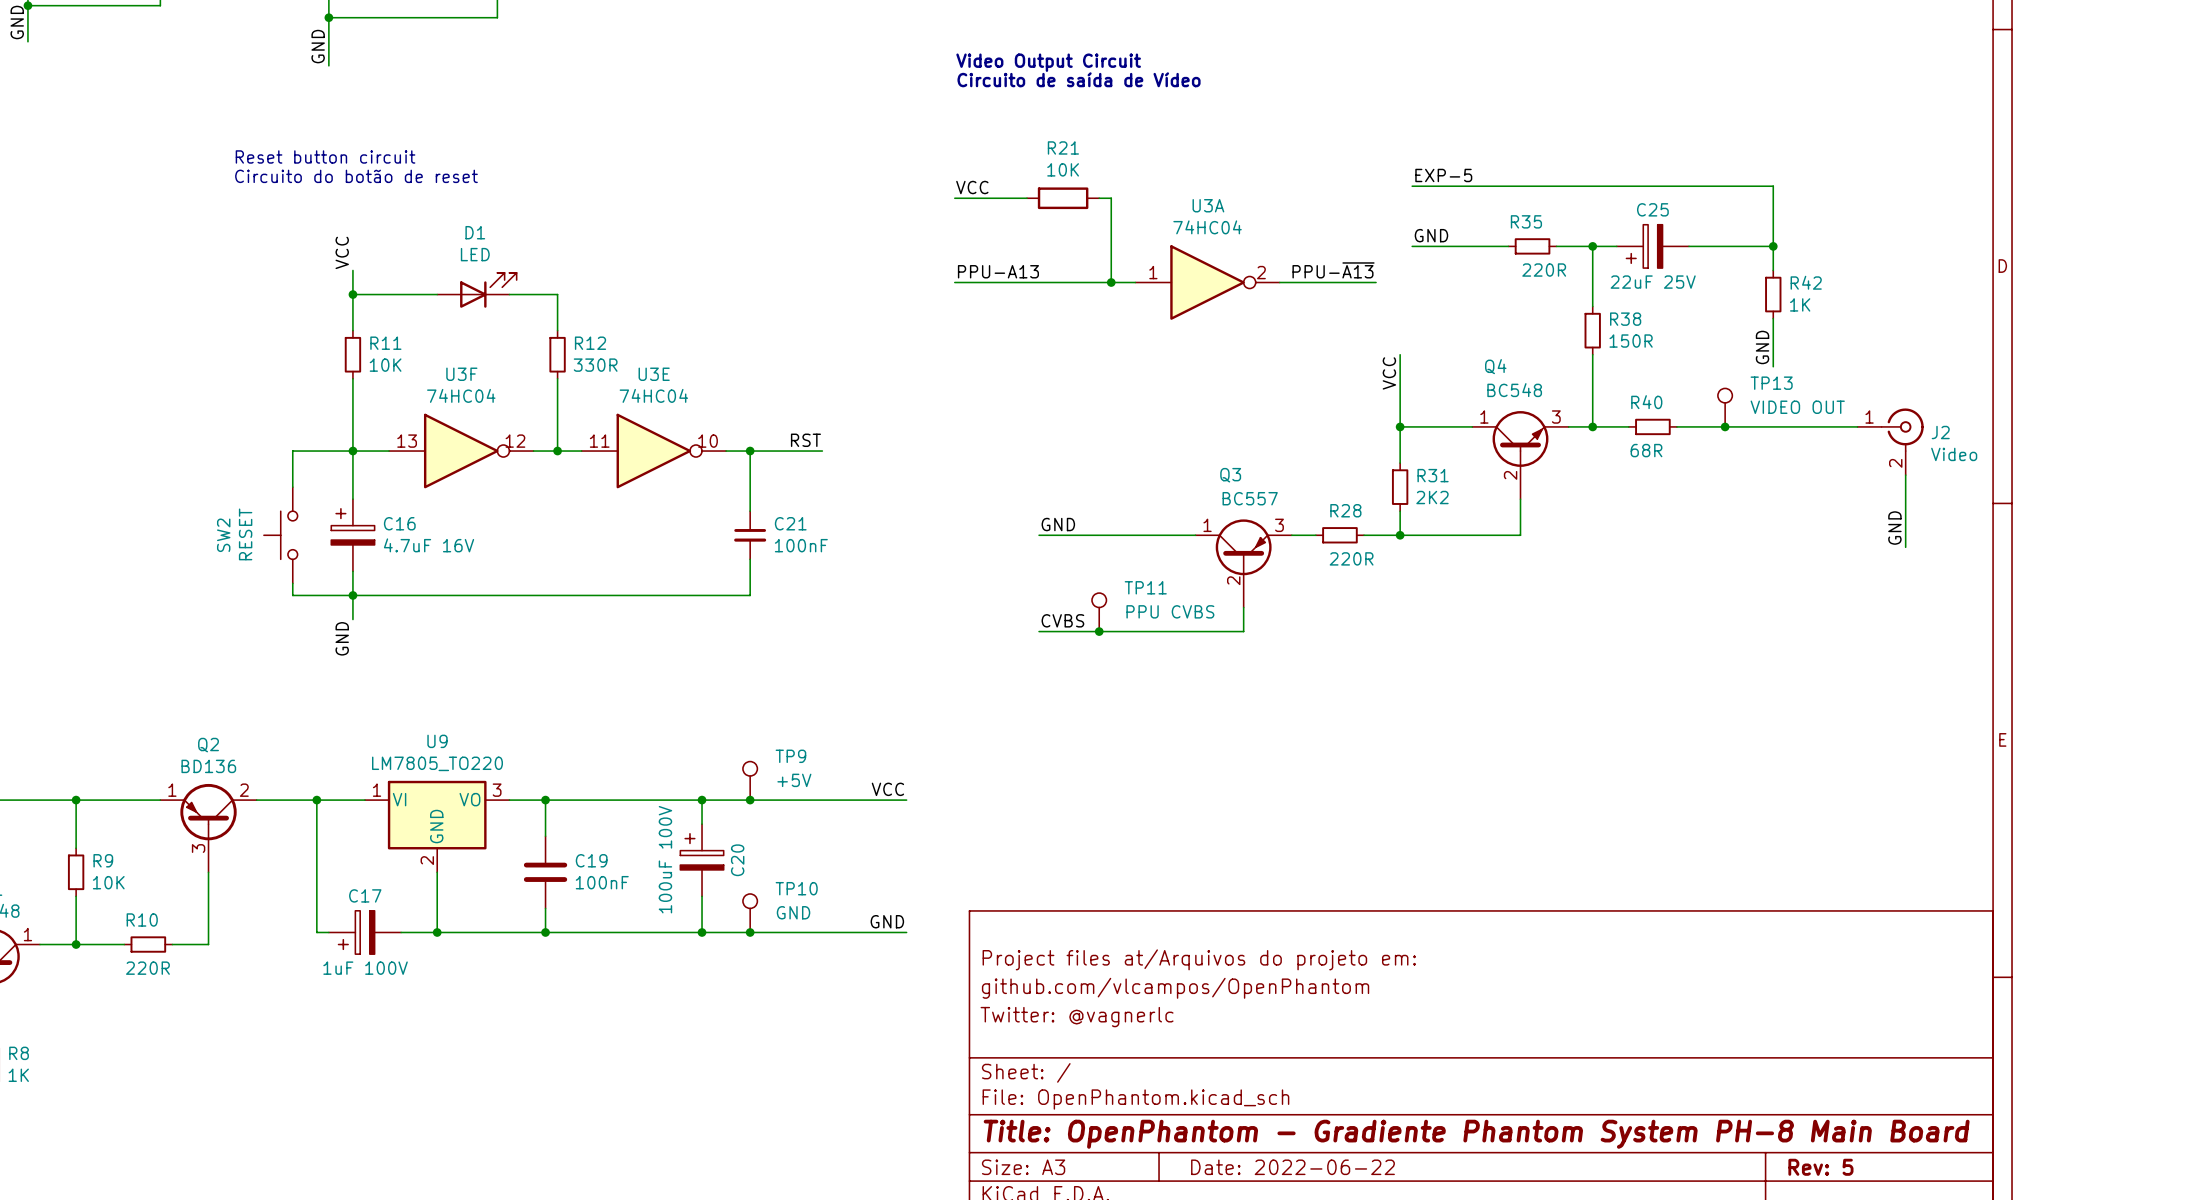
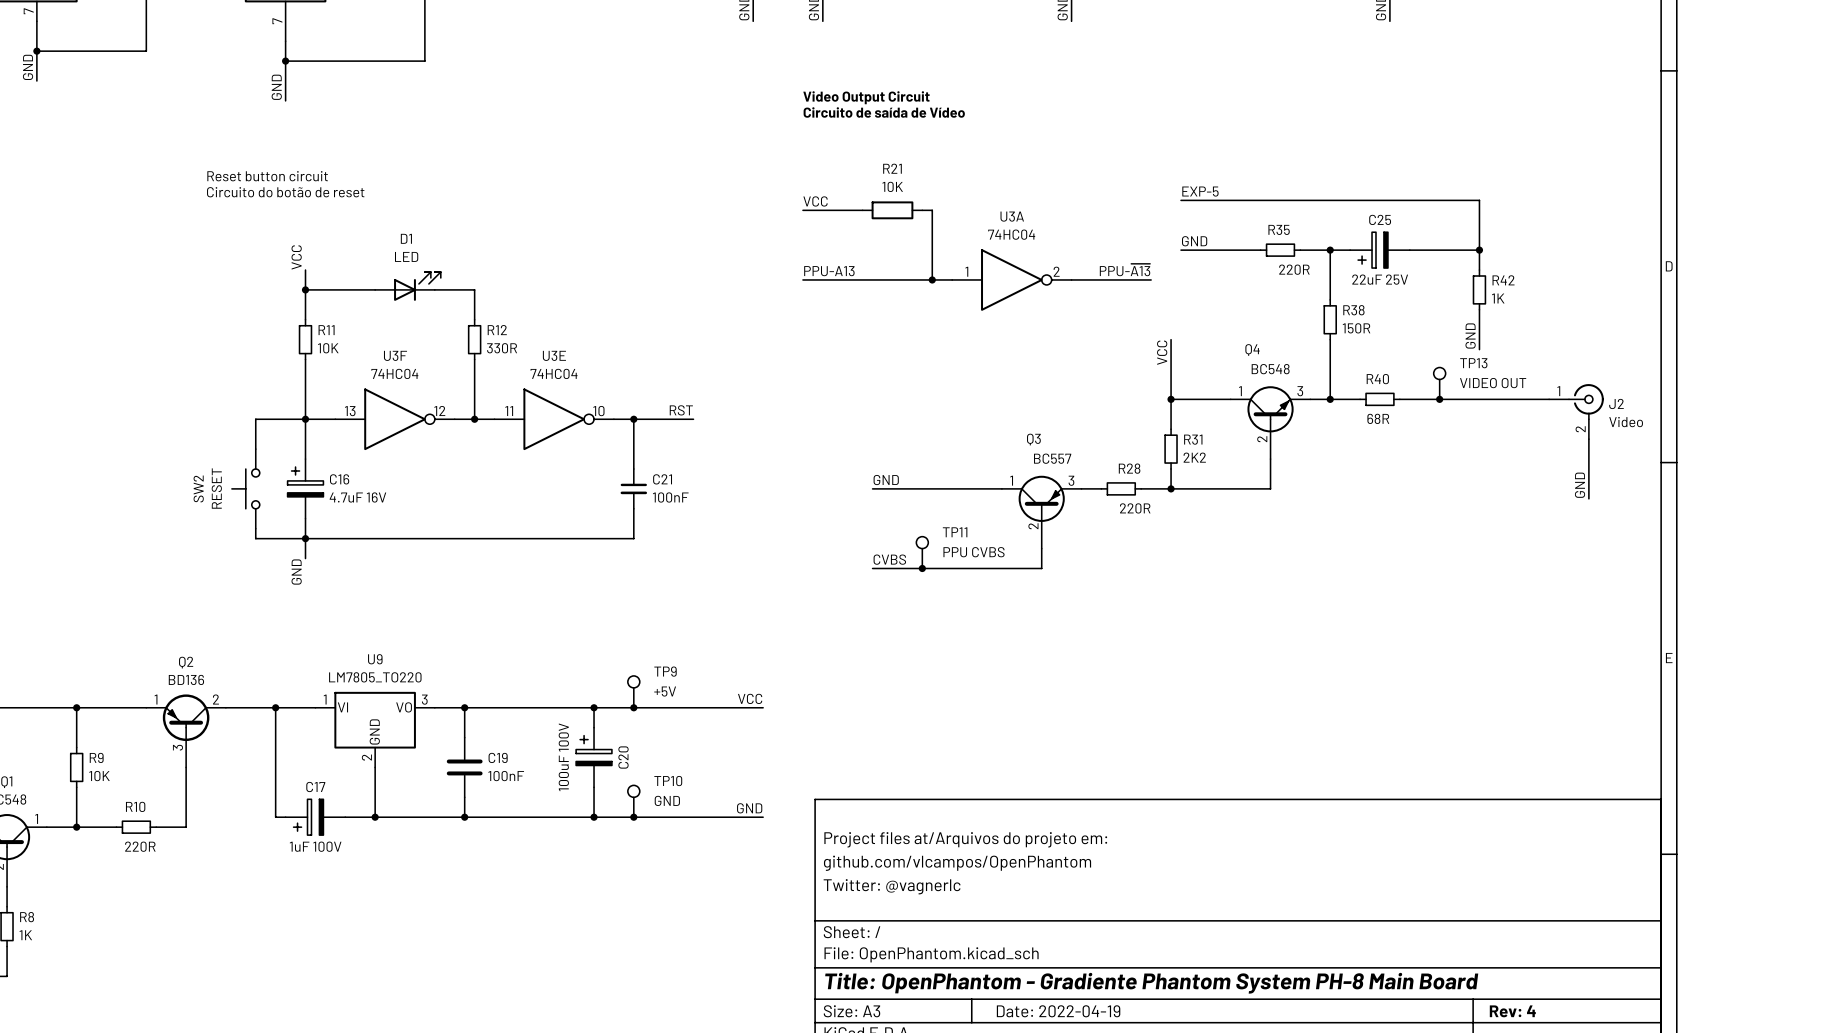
title block: Date: 2022-06-22 (1293, 1167) -> Date: 2022-04-19 (1058, 1011)
title block: Rev: 5 (1820, 1167) -> Rev: 4 (1512, 1011)

